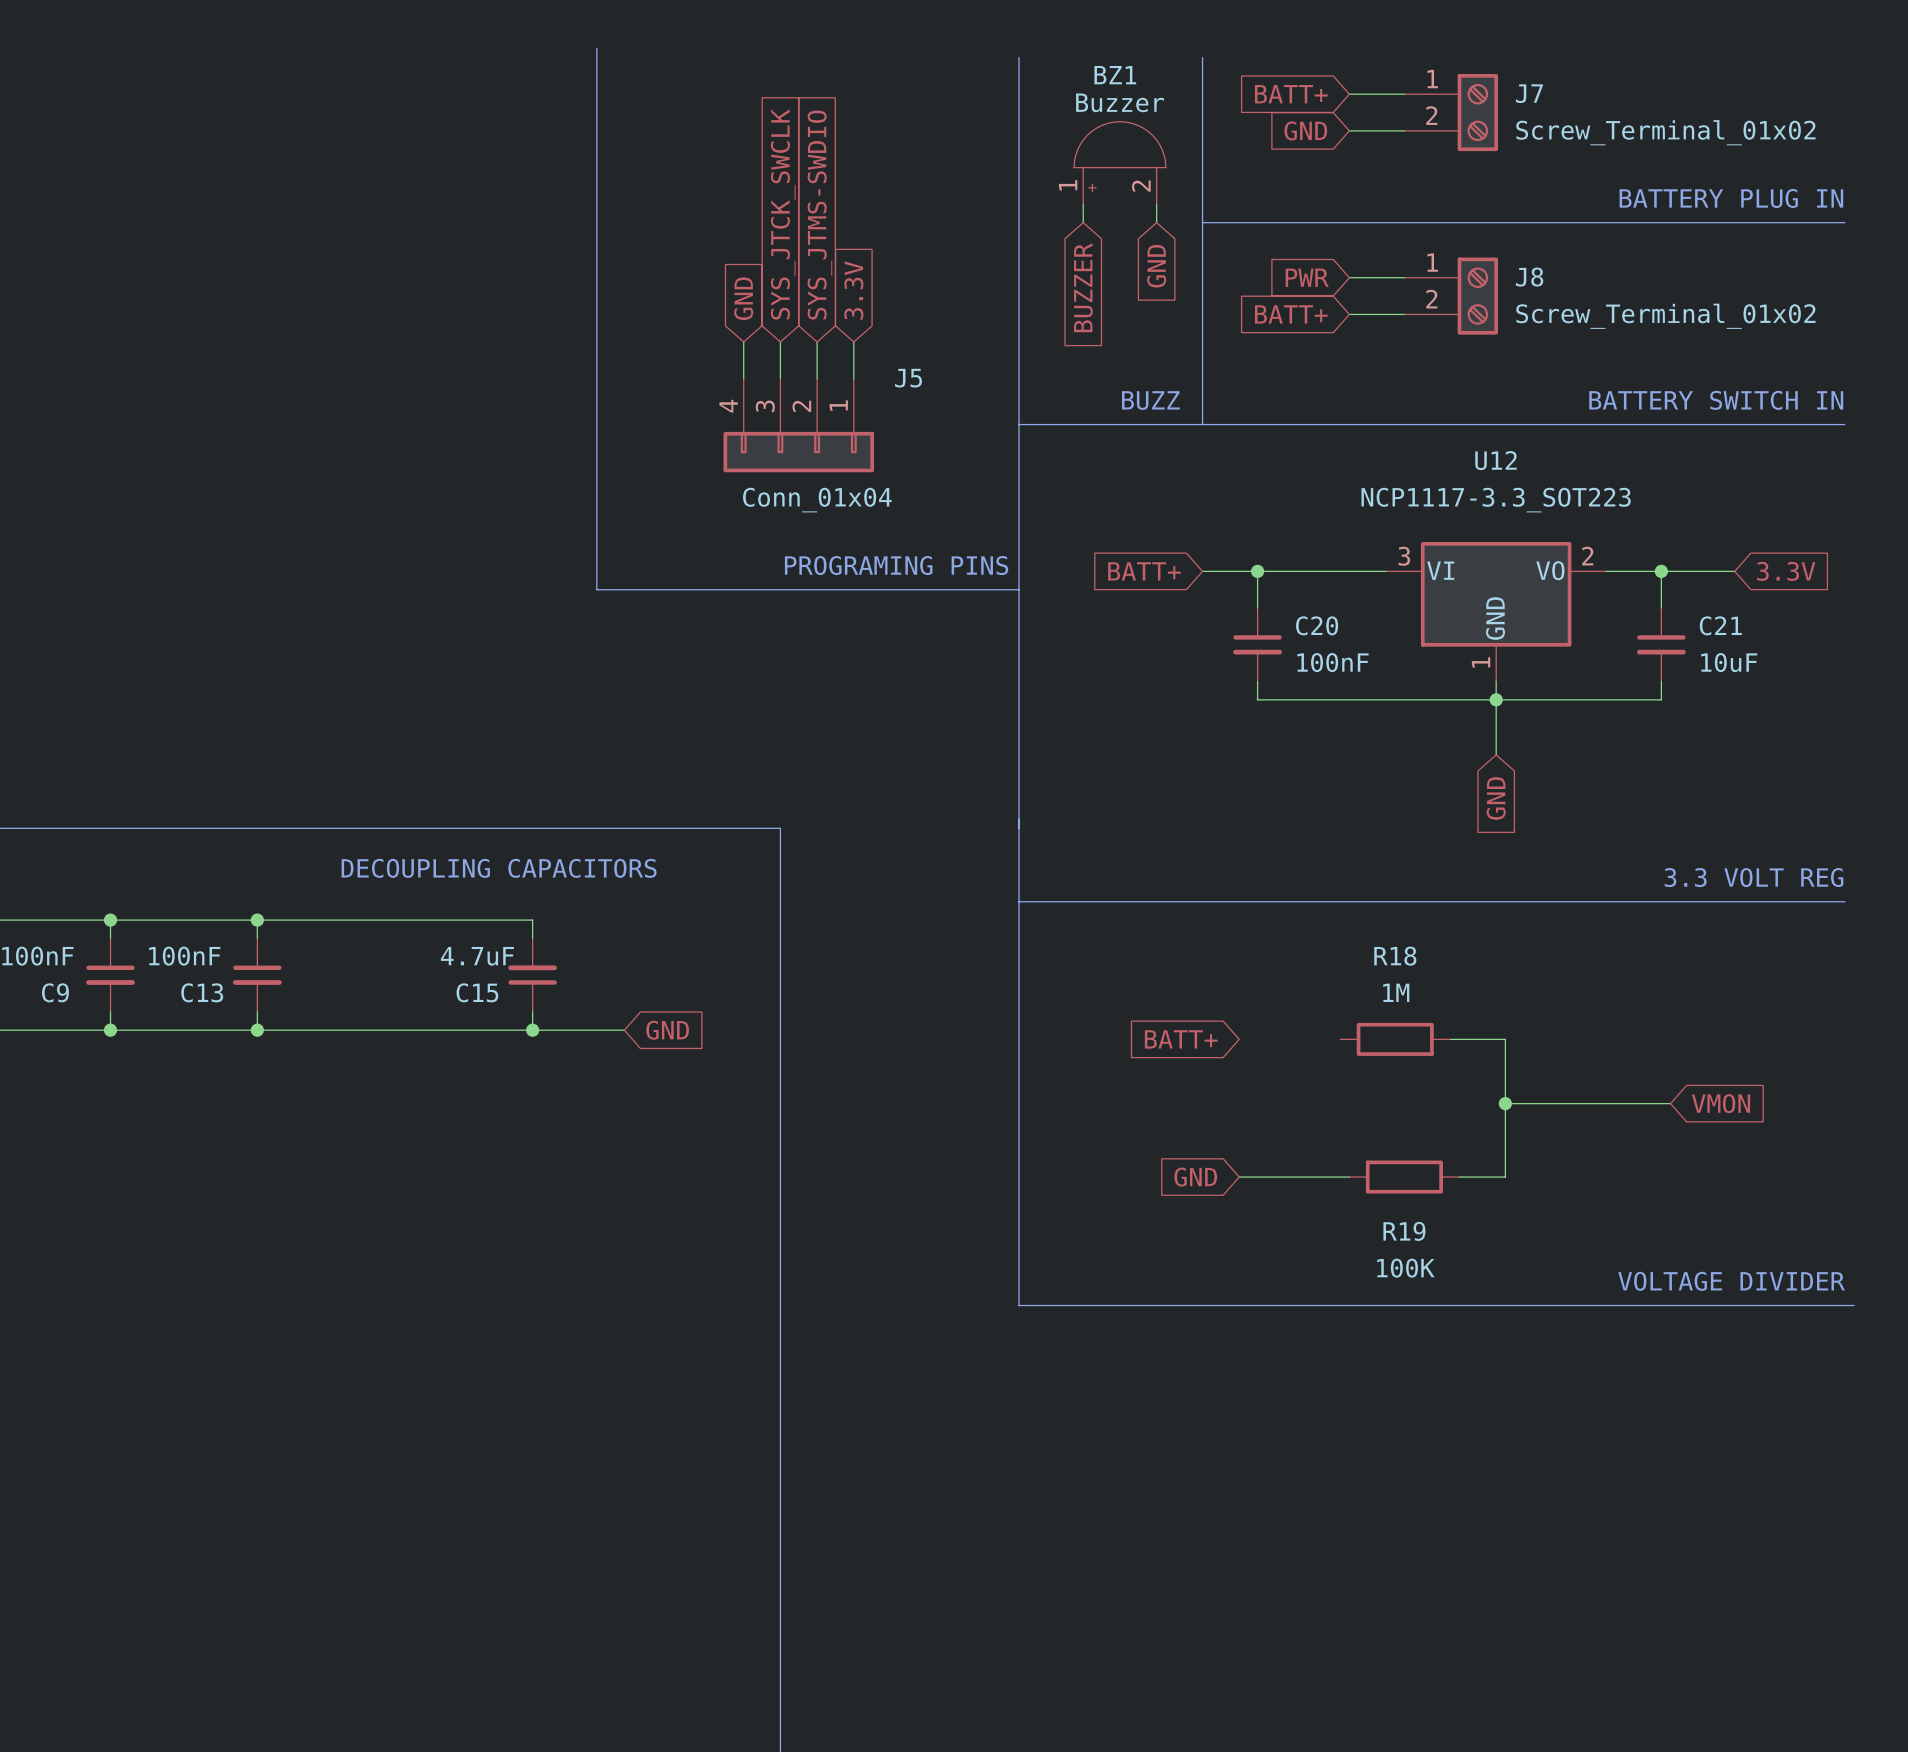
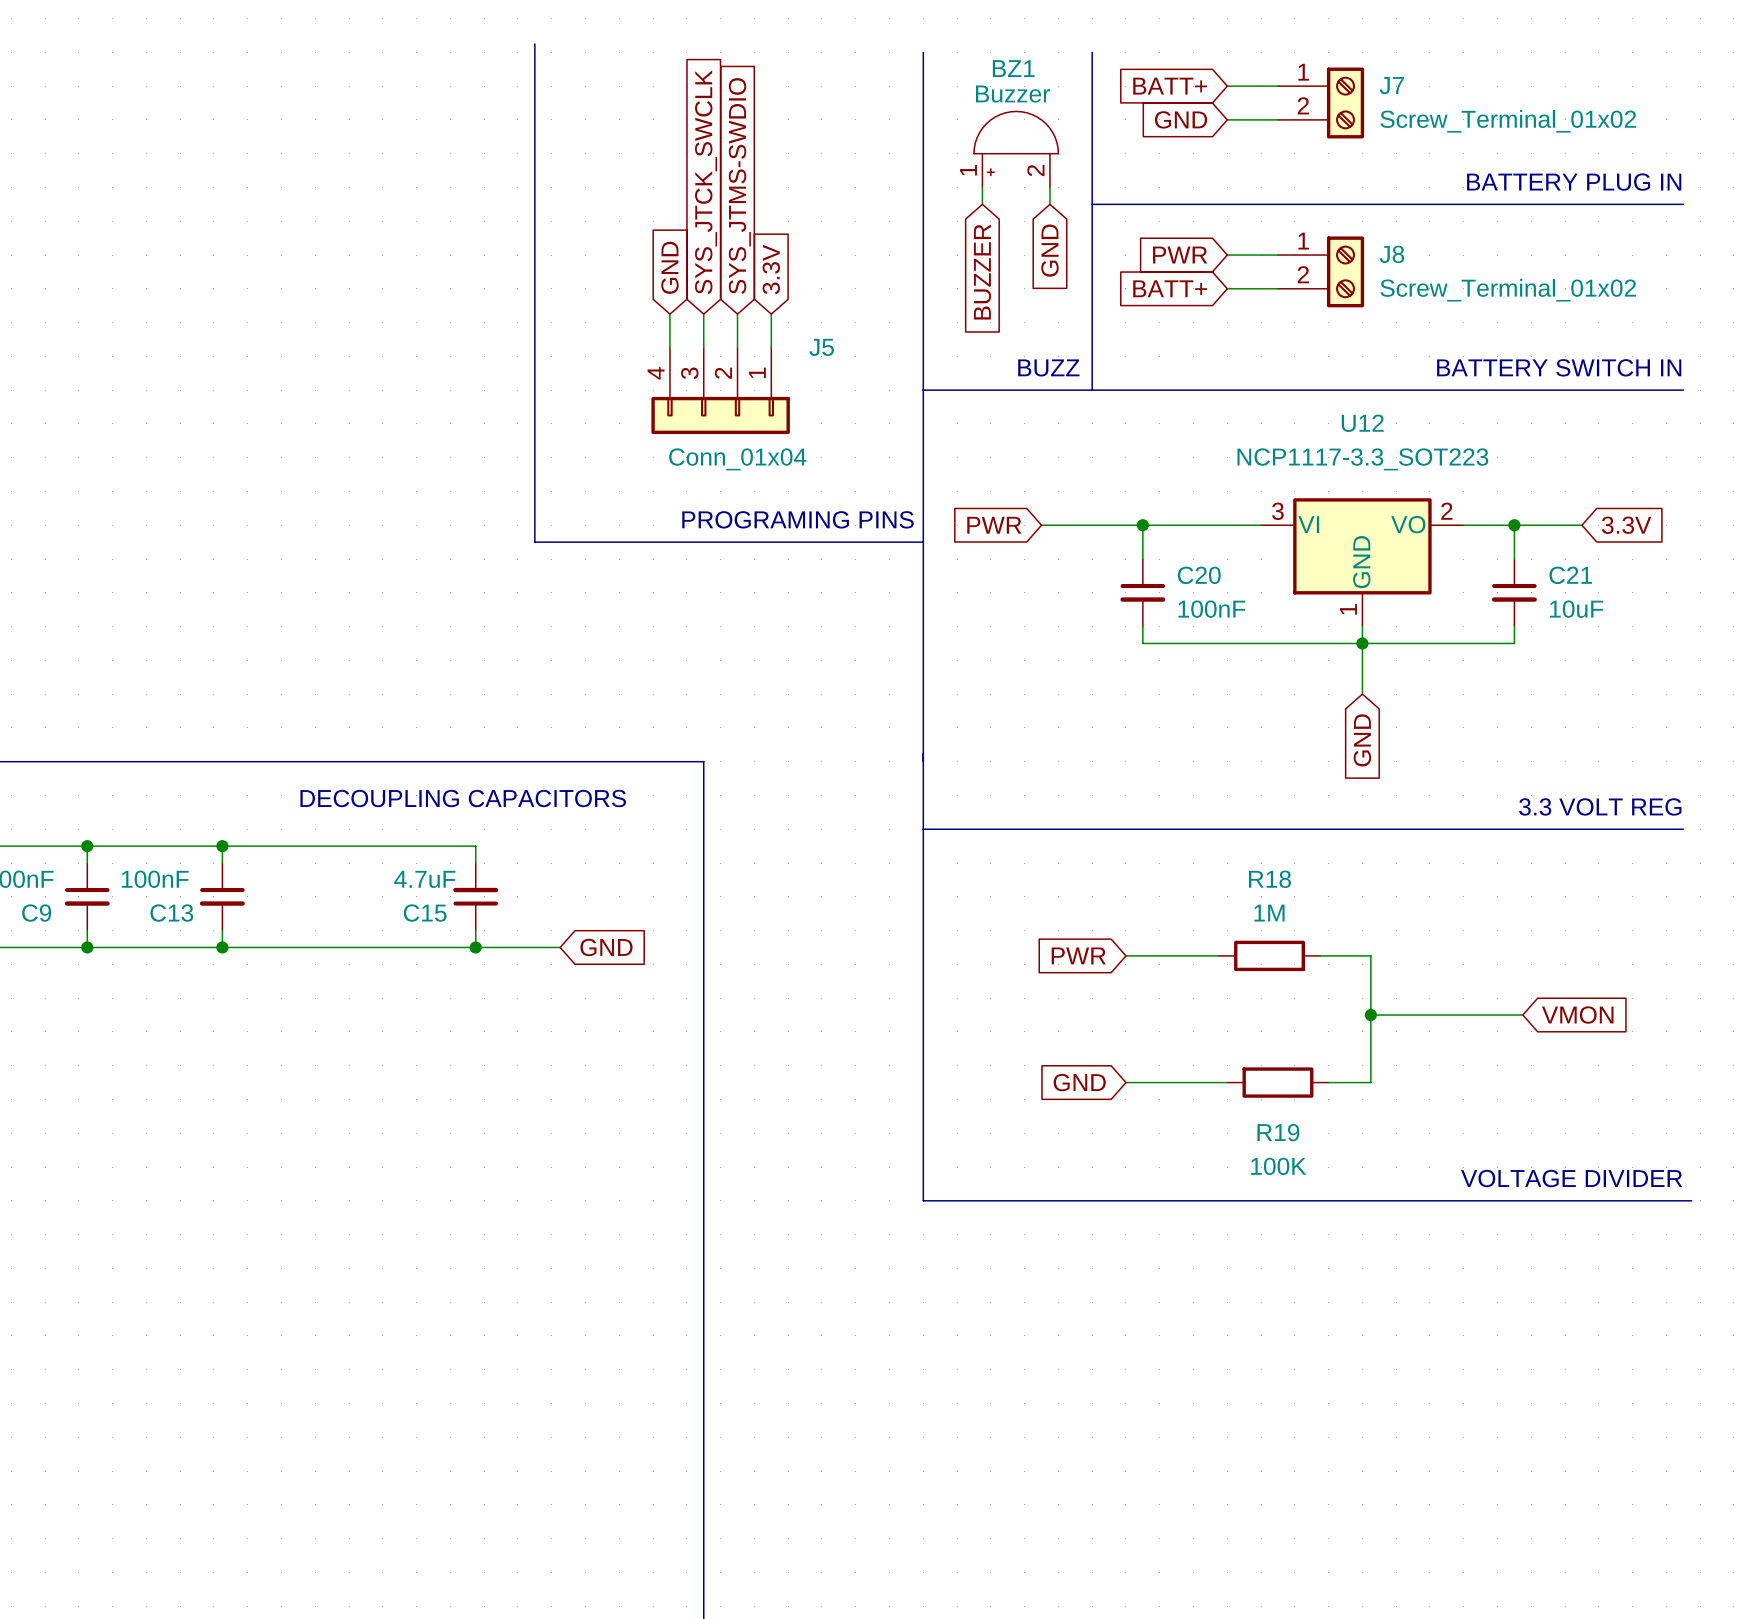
global label: none -> PWR (994, 525)
global label: BATT+ (1144, 571) -> none
wire: none -> (1041, 525) (1092, 525)
global label: BATT+ (1181, 1039) -> PWR (1078, 955)
wire: none -> (1125, 955) (1218, 955)

